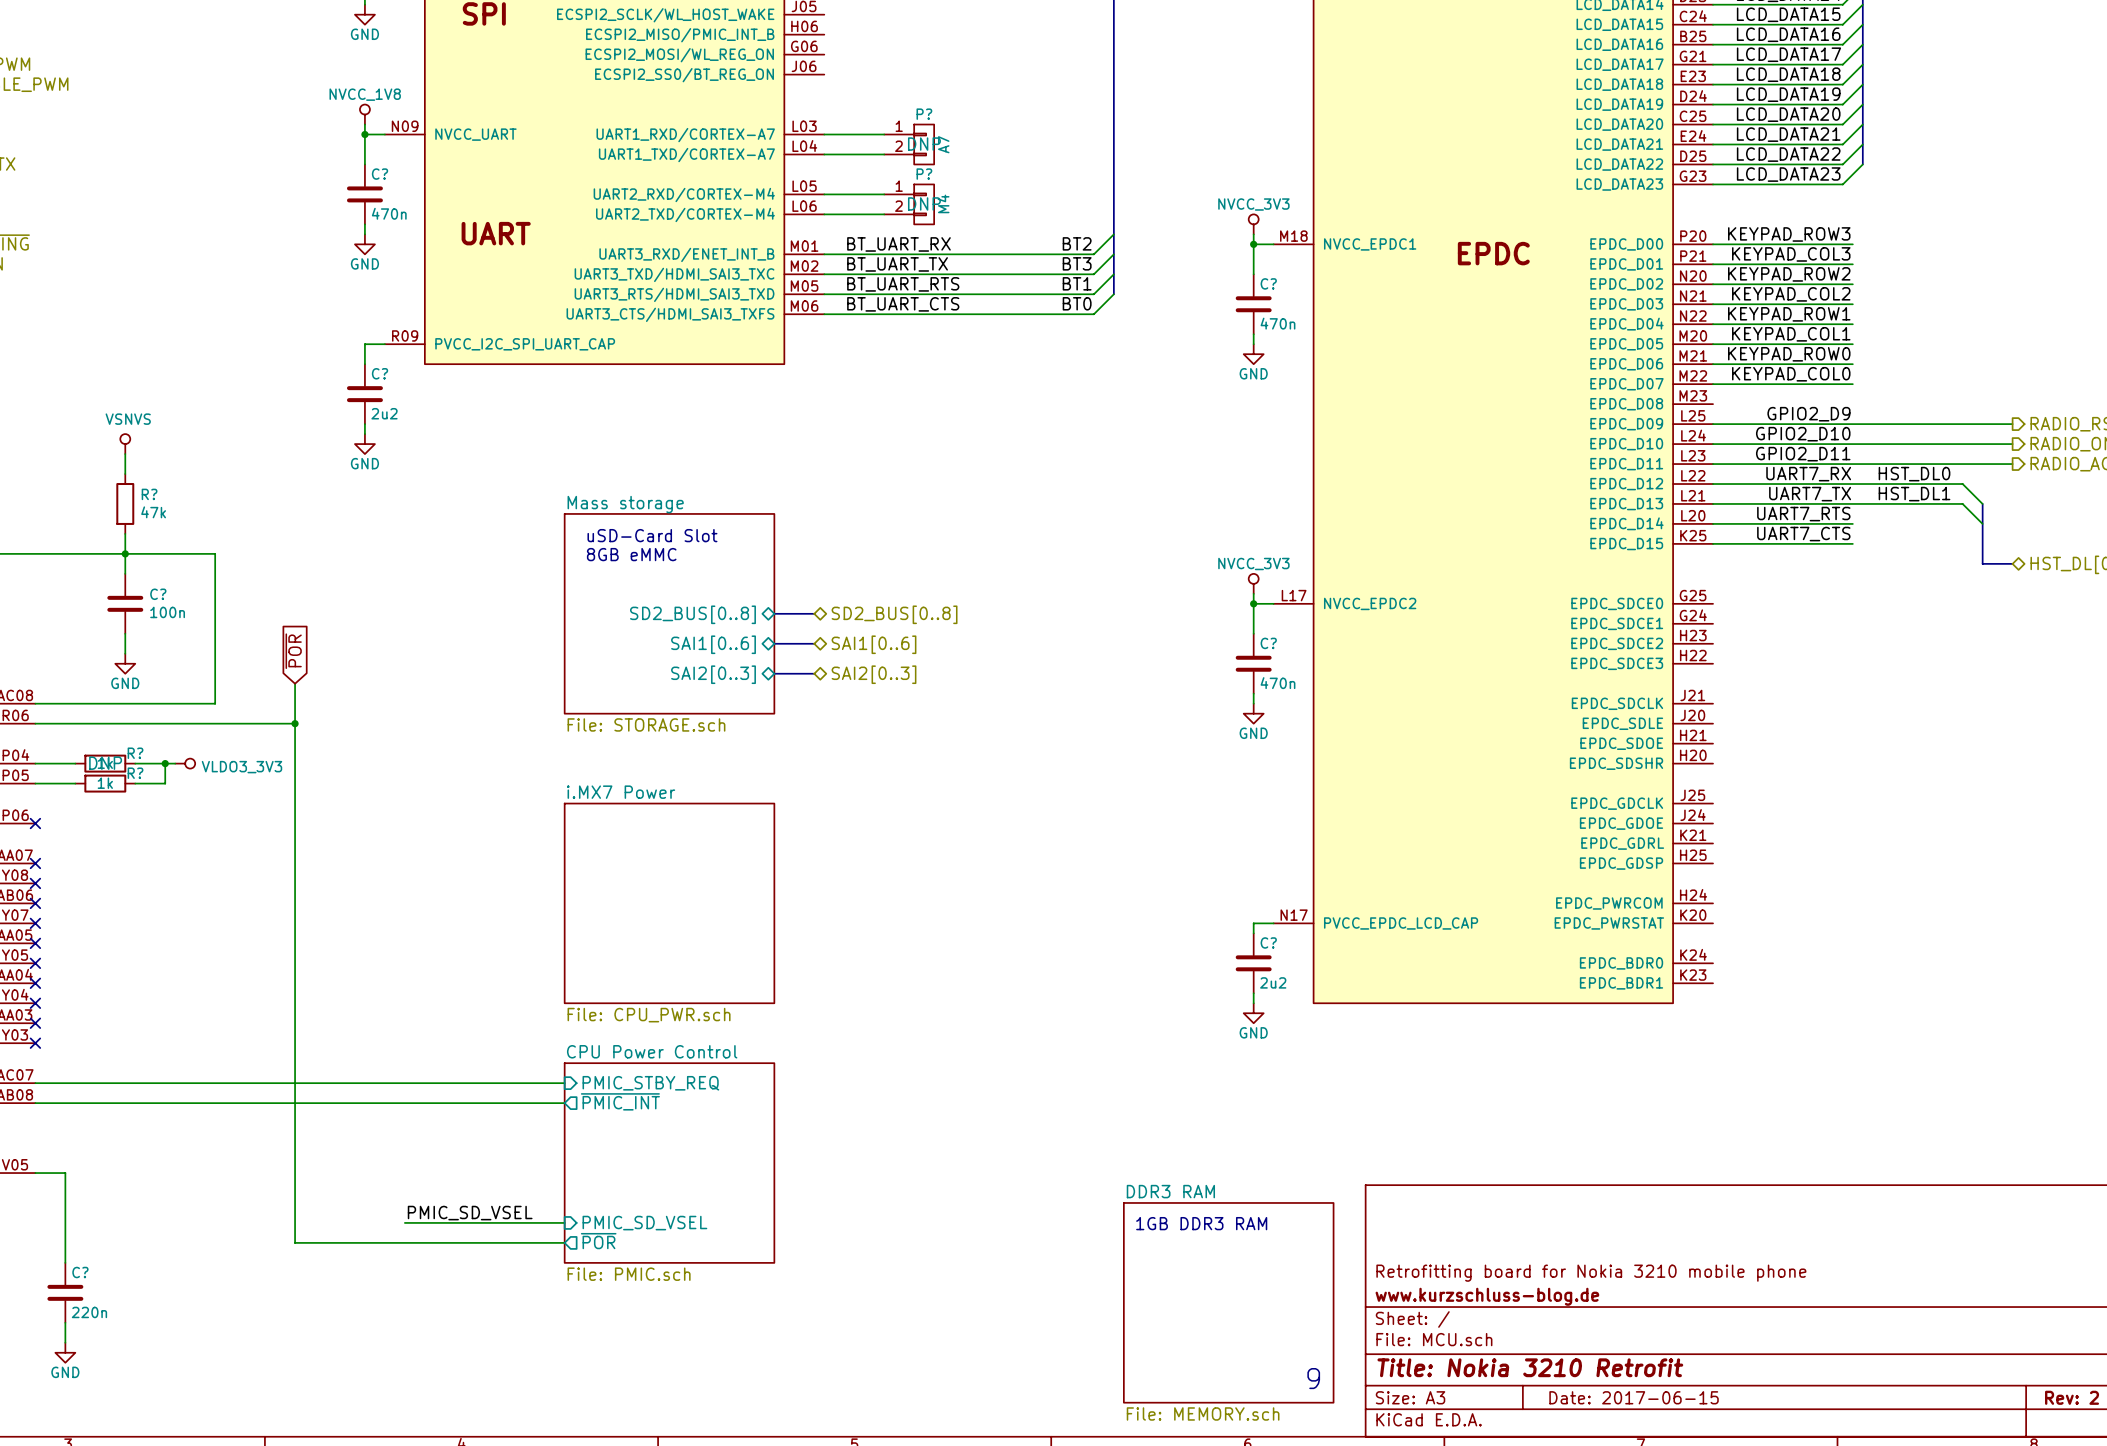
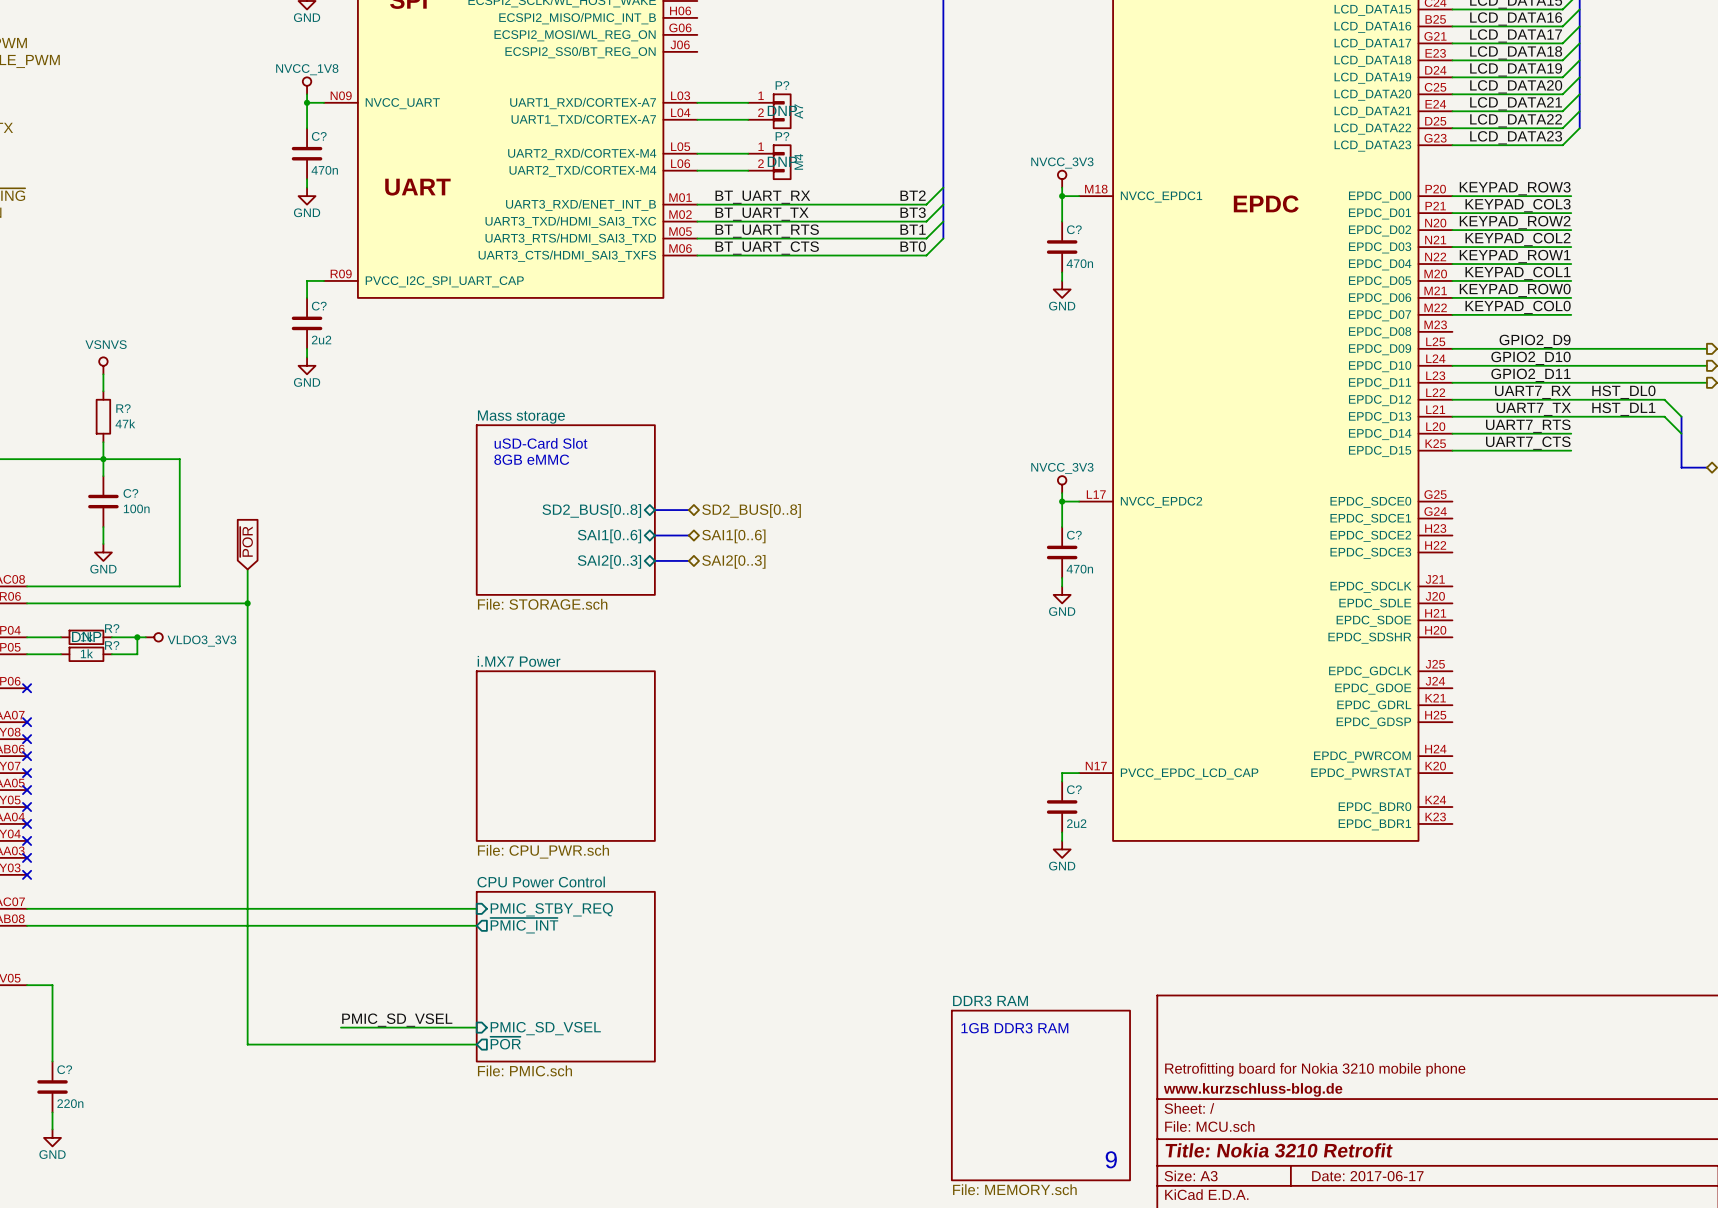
title block: Date: 2017-06-15 (1634, 1397) -> Date: 2017-06-17 (1367, 1176)

